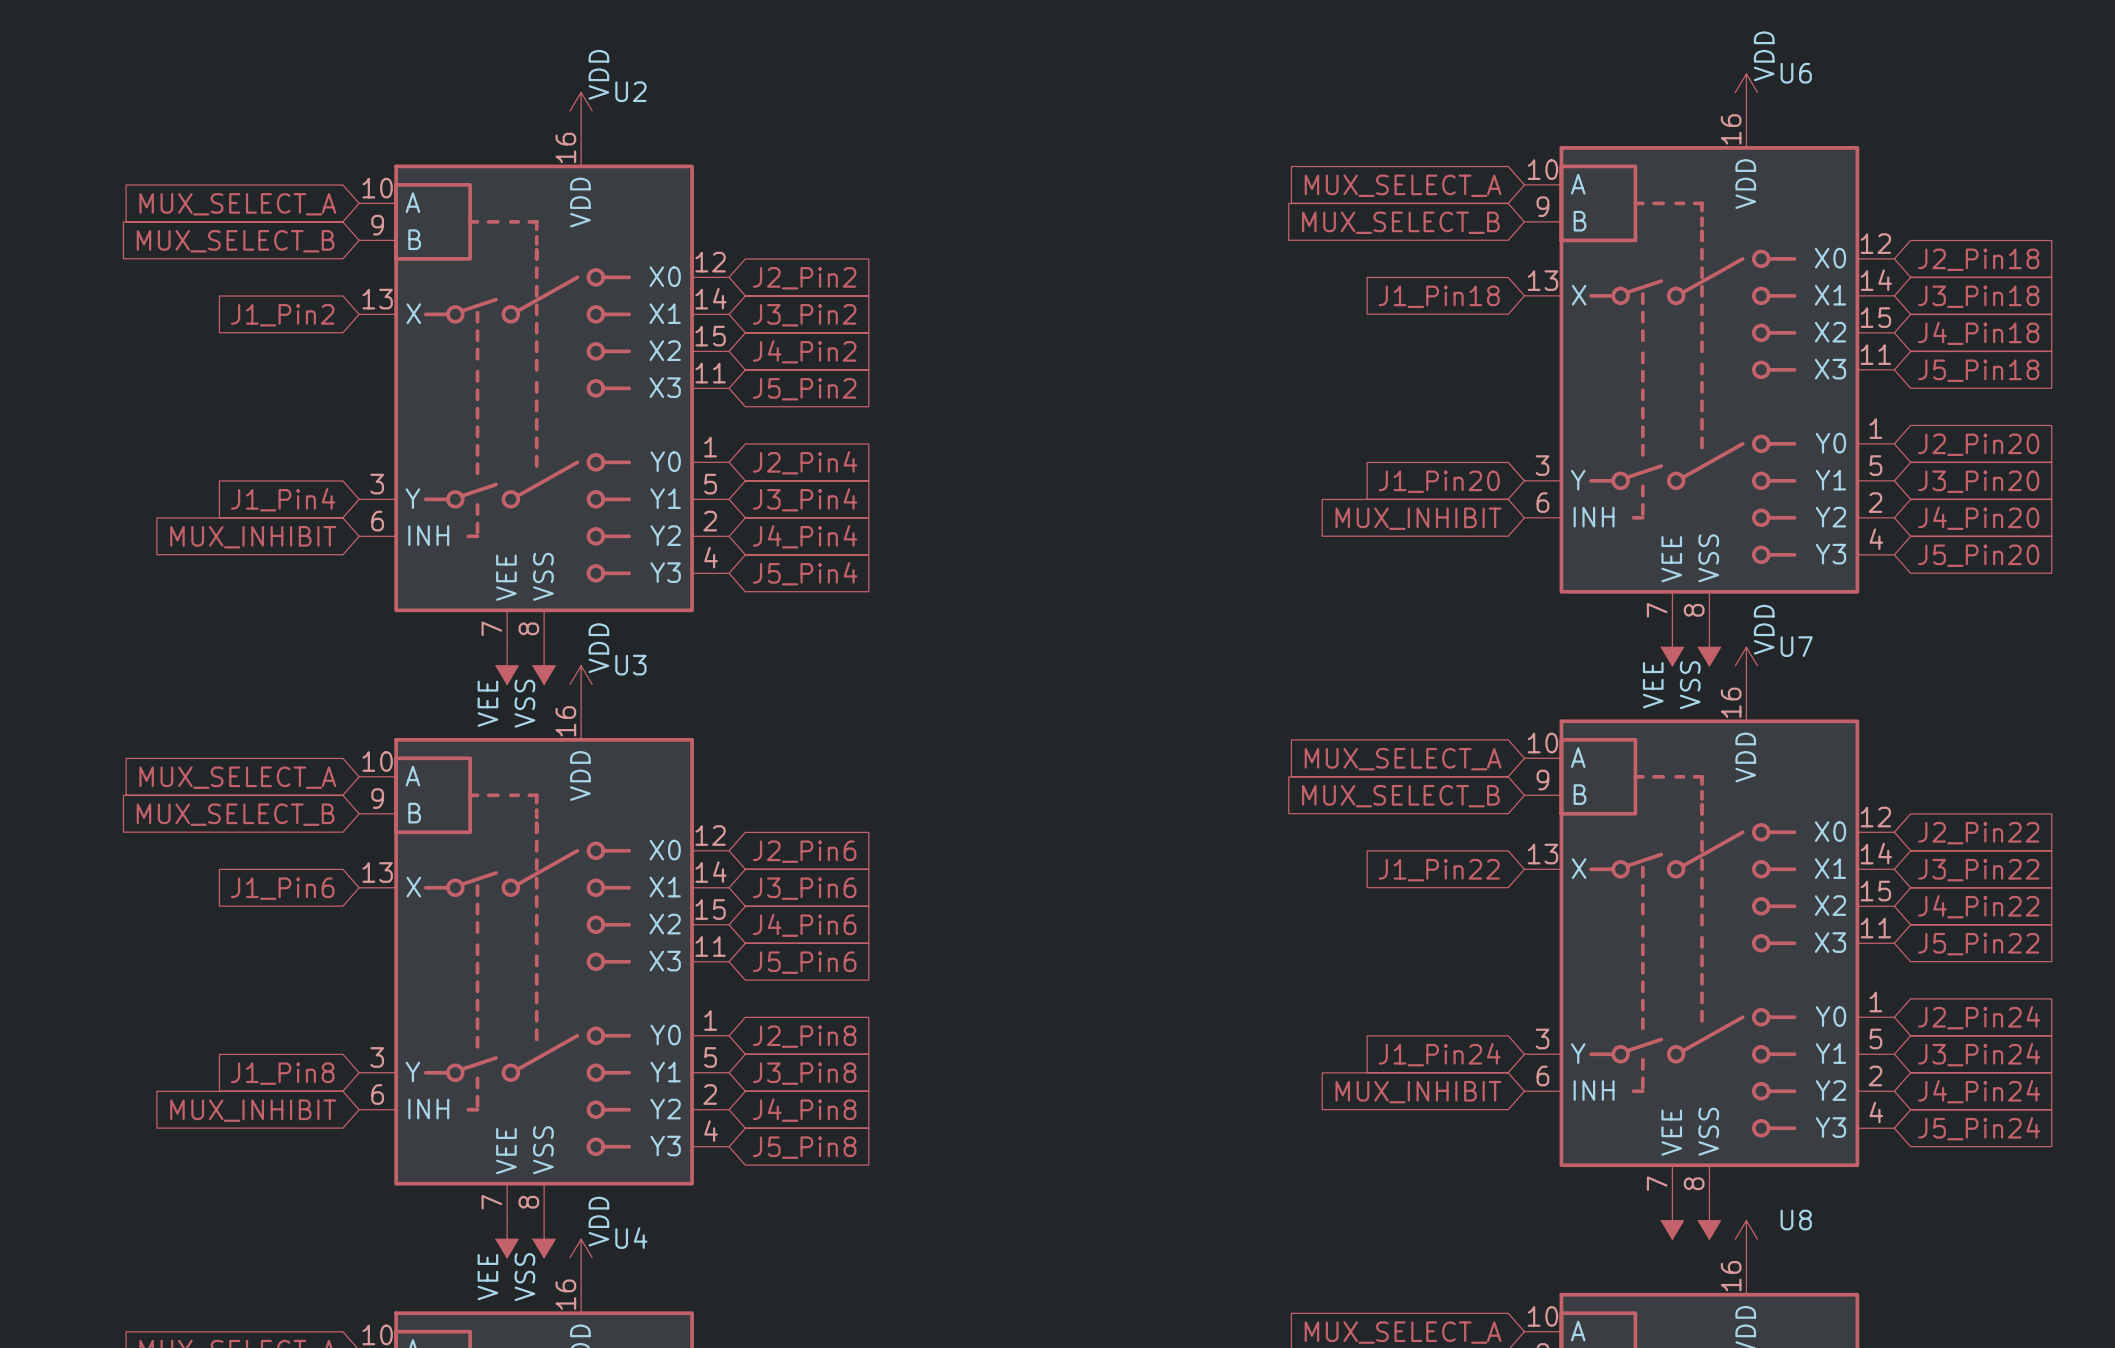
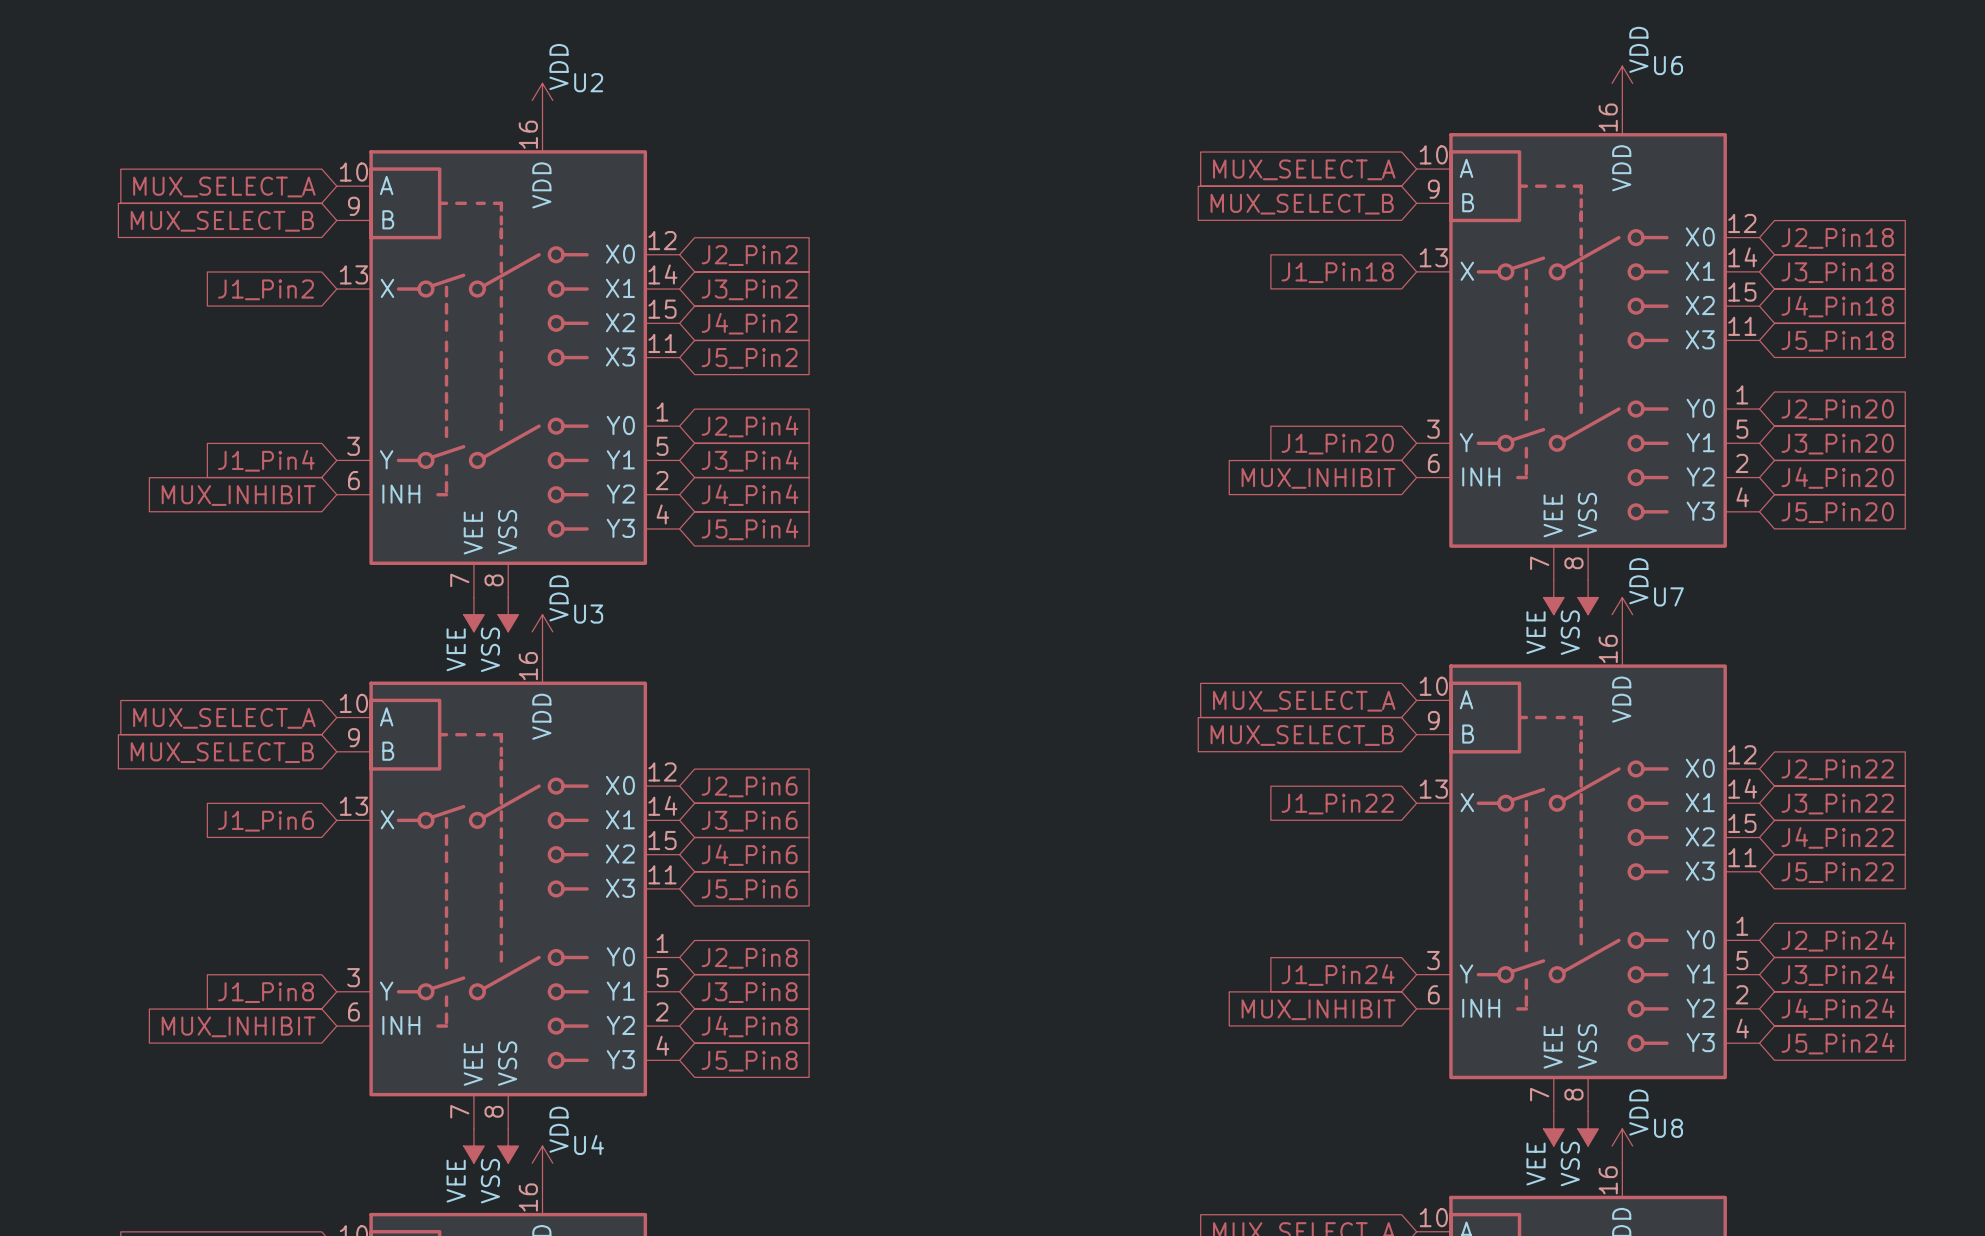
power symbol text: none -> VDD (1638, 1112)
power symbol text: none -> VEE (1536, 1164)
power symbol text: none -> VSS (1570, 1164)

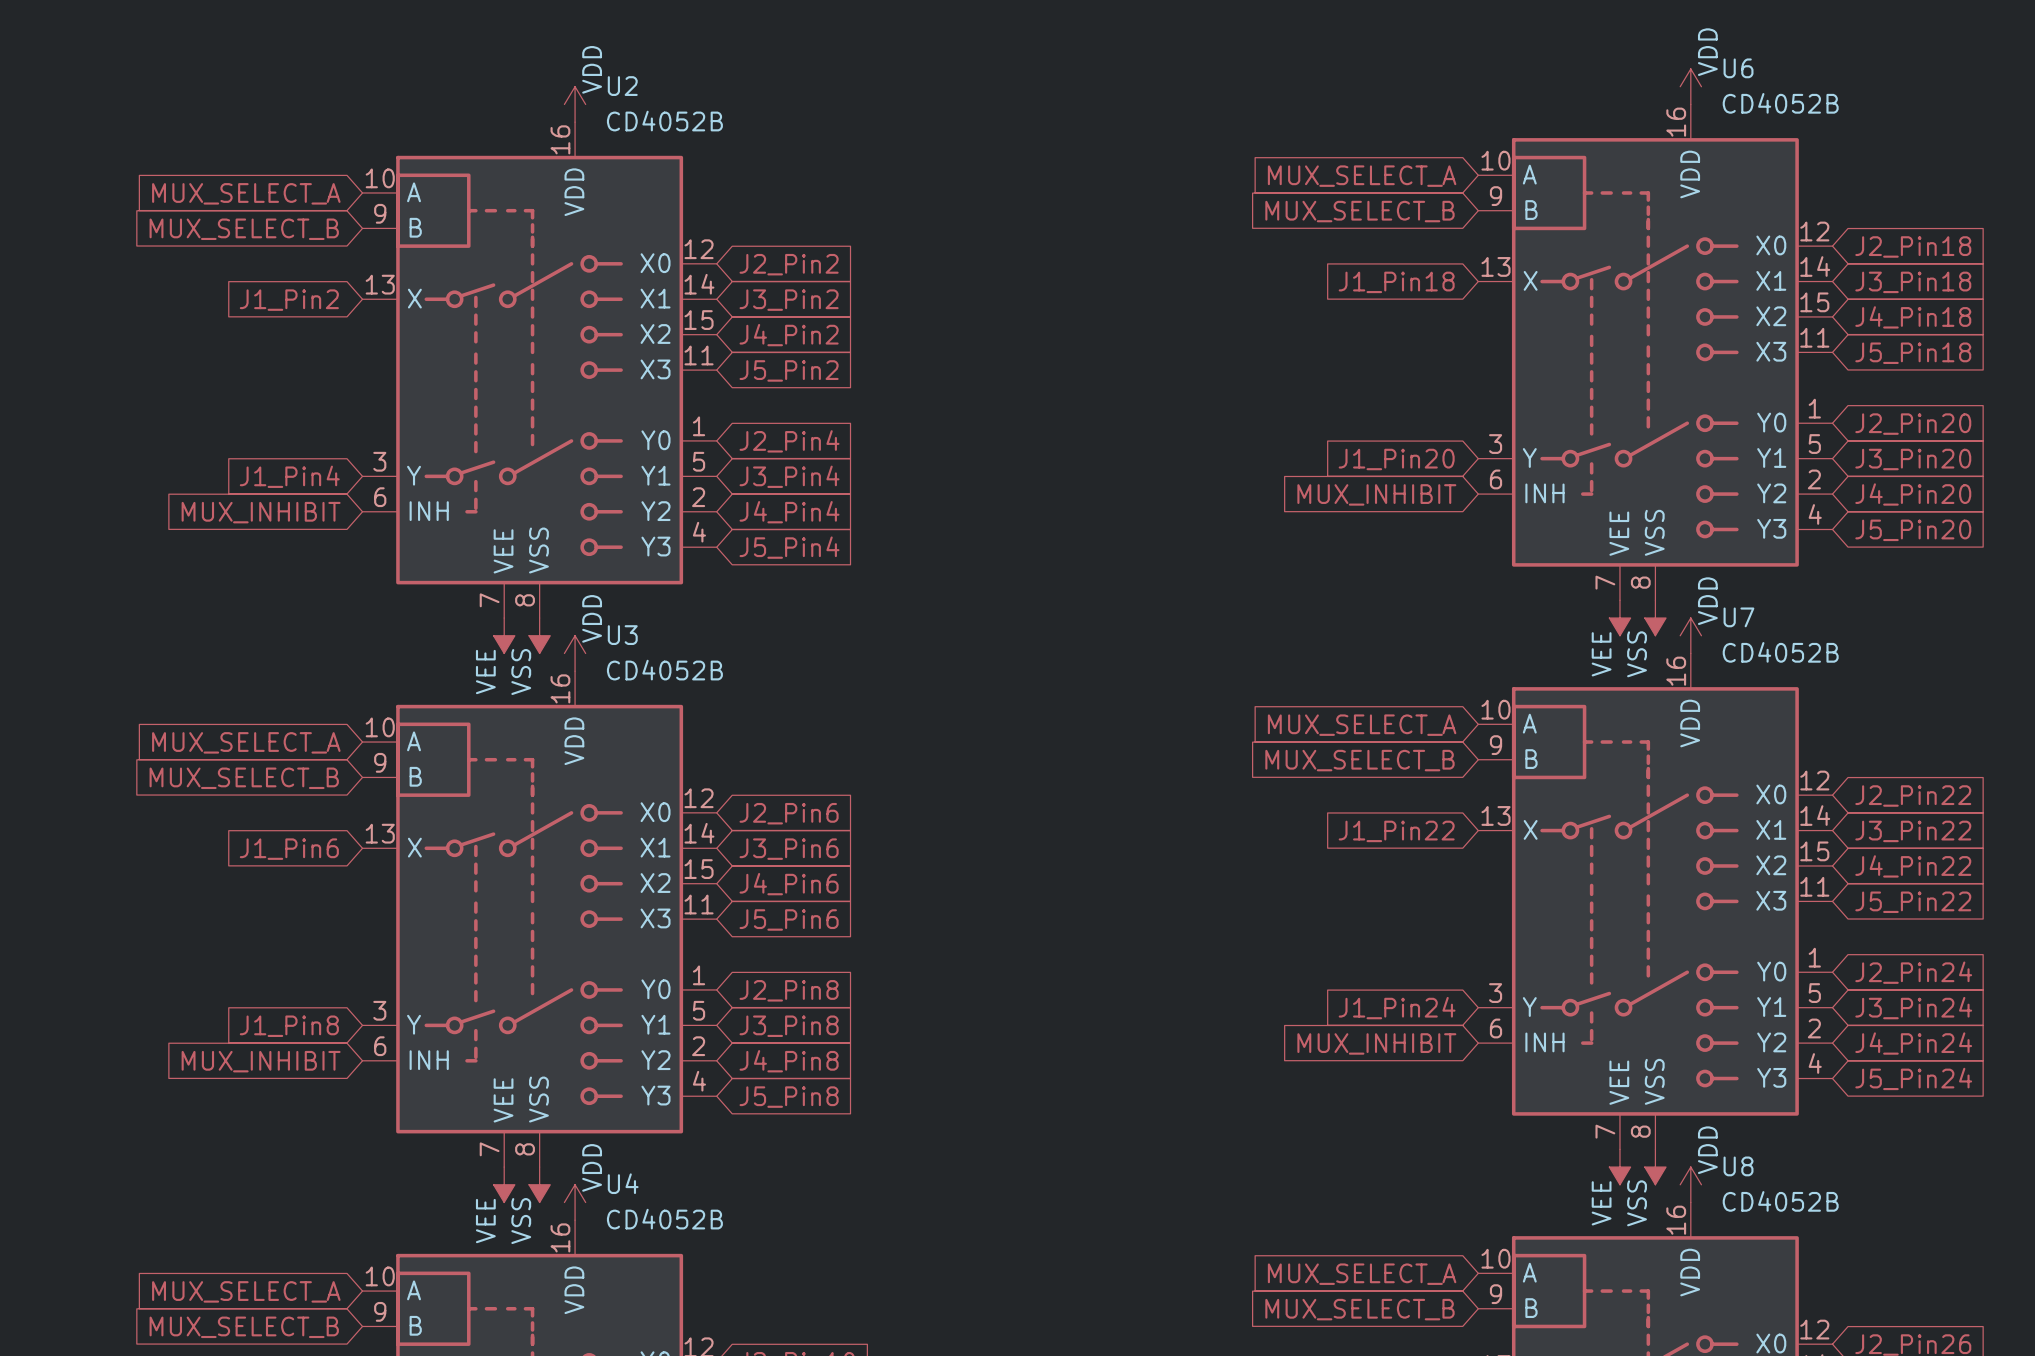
U6 value: none -> CD4052B (1780, 103)
U2 value: none -> CD4052B (664, 121)
U7 value: none -> CD4052B (1780, 652)
U3 value: none -> CD4052B (664, 670)
U8 value: none -> CD4052B (1780, 1201)
U4 value: none -> CD4052B (664, 1219)

